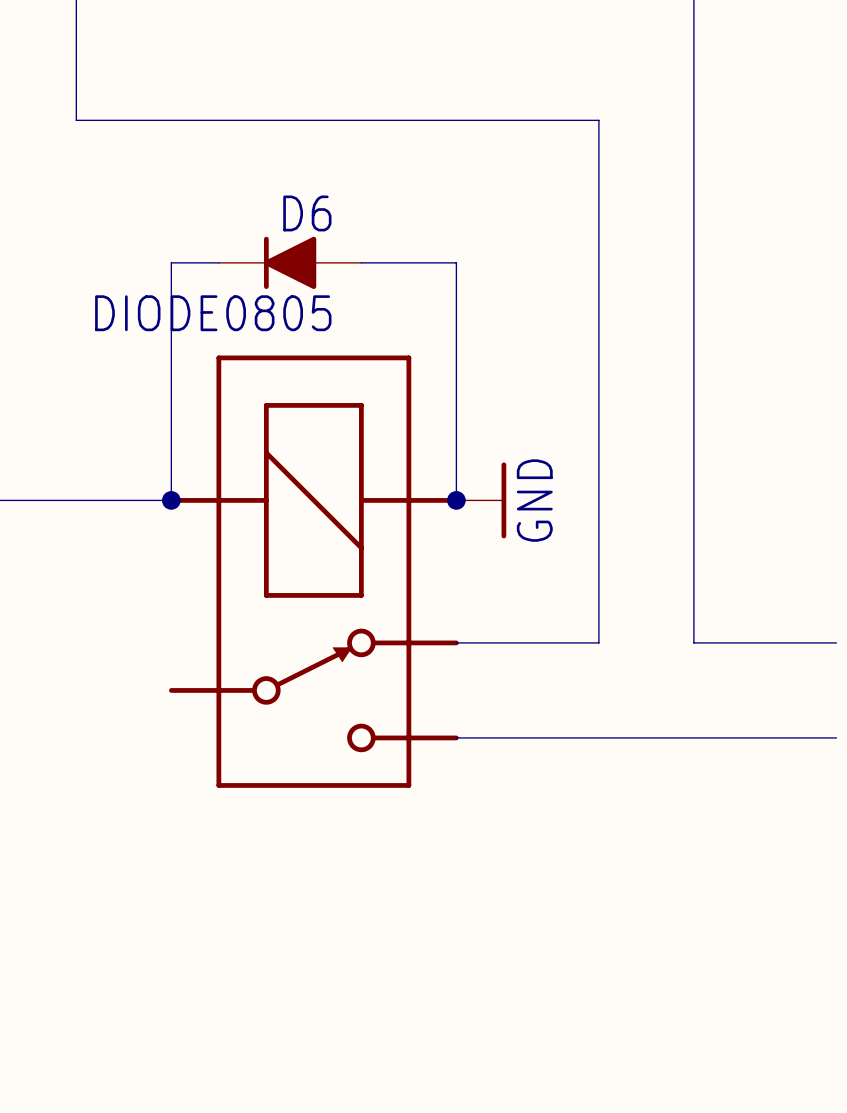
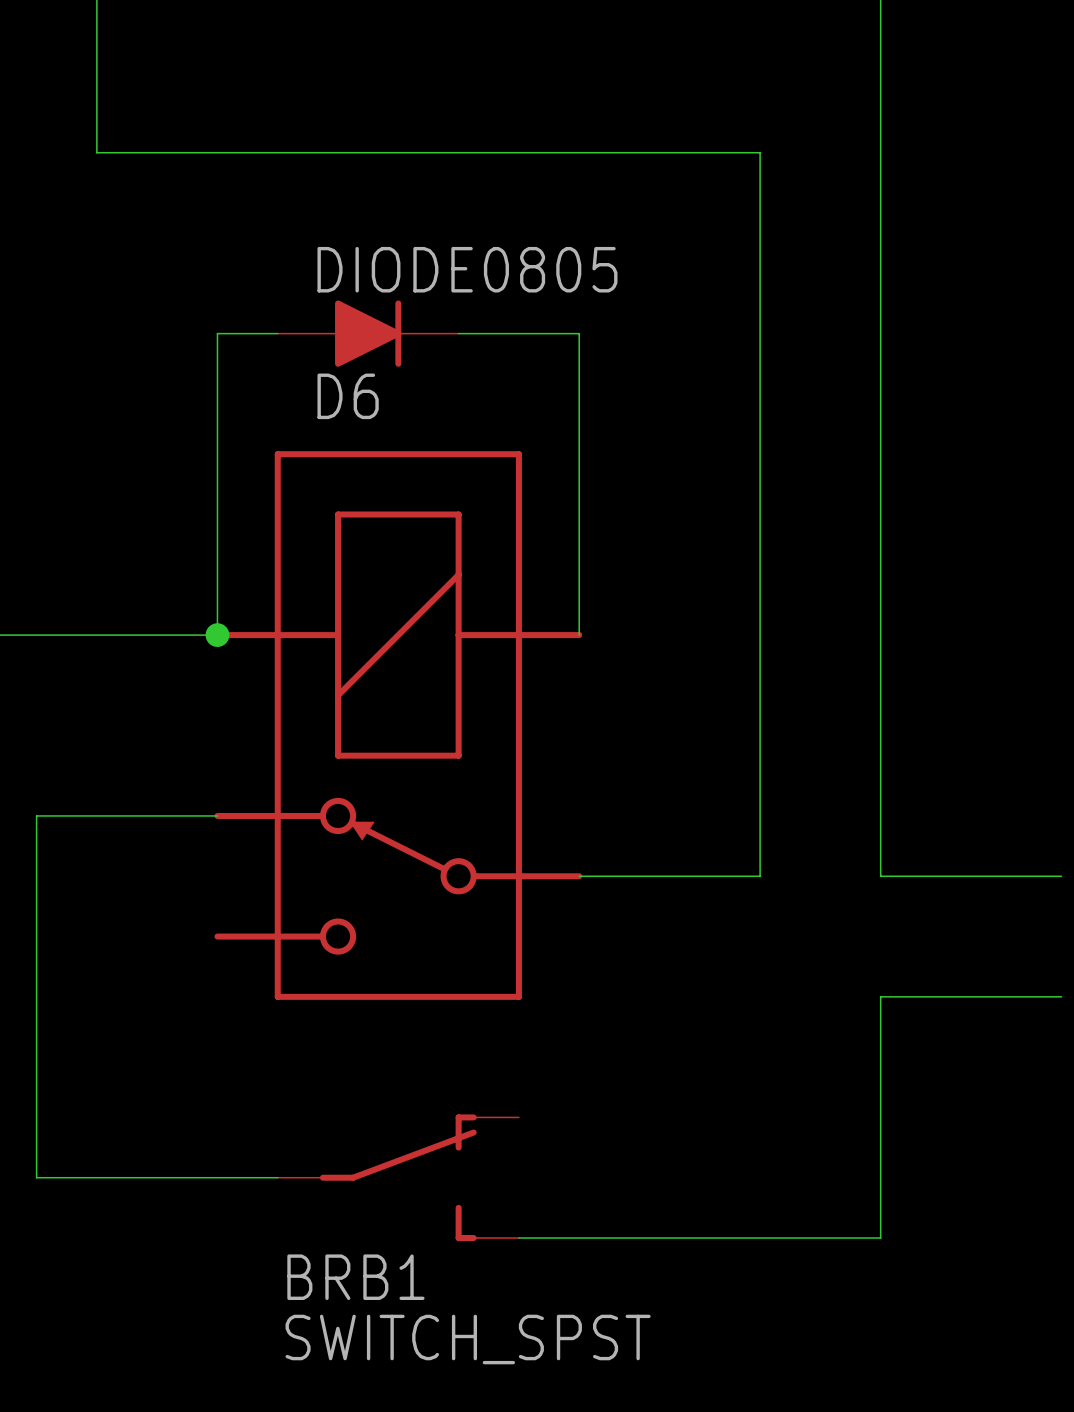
D6 rotation: 0° (290, 262) -> 180° (368, 333)
junction: (456, 500) -> none
power symbol: GND (481, 500) -> none
part flip: as is (313, 571) -> left-right (398, 725)
wire: none -> (217, 815) (36, 815) (36, 1177) (277, 1177)
wire: (456, 642) (598, 642) -> (579, 876) (760, 876) (760, 815)
wire: (693, 642) (836, 642) -> (880, 815) (880, 876) (1061, 876)
wire: (456, 737) (836, 737) -> none
wire: none -> (1061, 996) (880, 996) (880, 1238) (518, 1238)
BRB1: none -> SWITCH_SPST (398, 1177)

